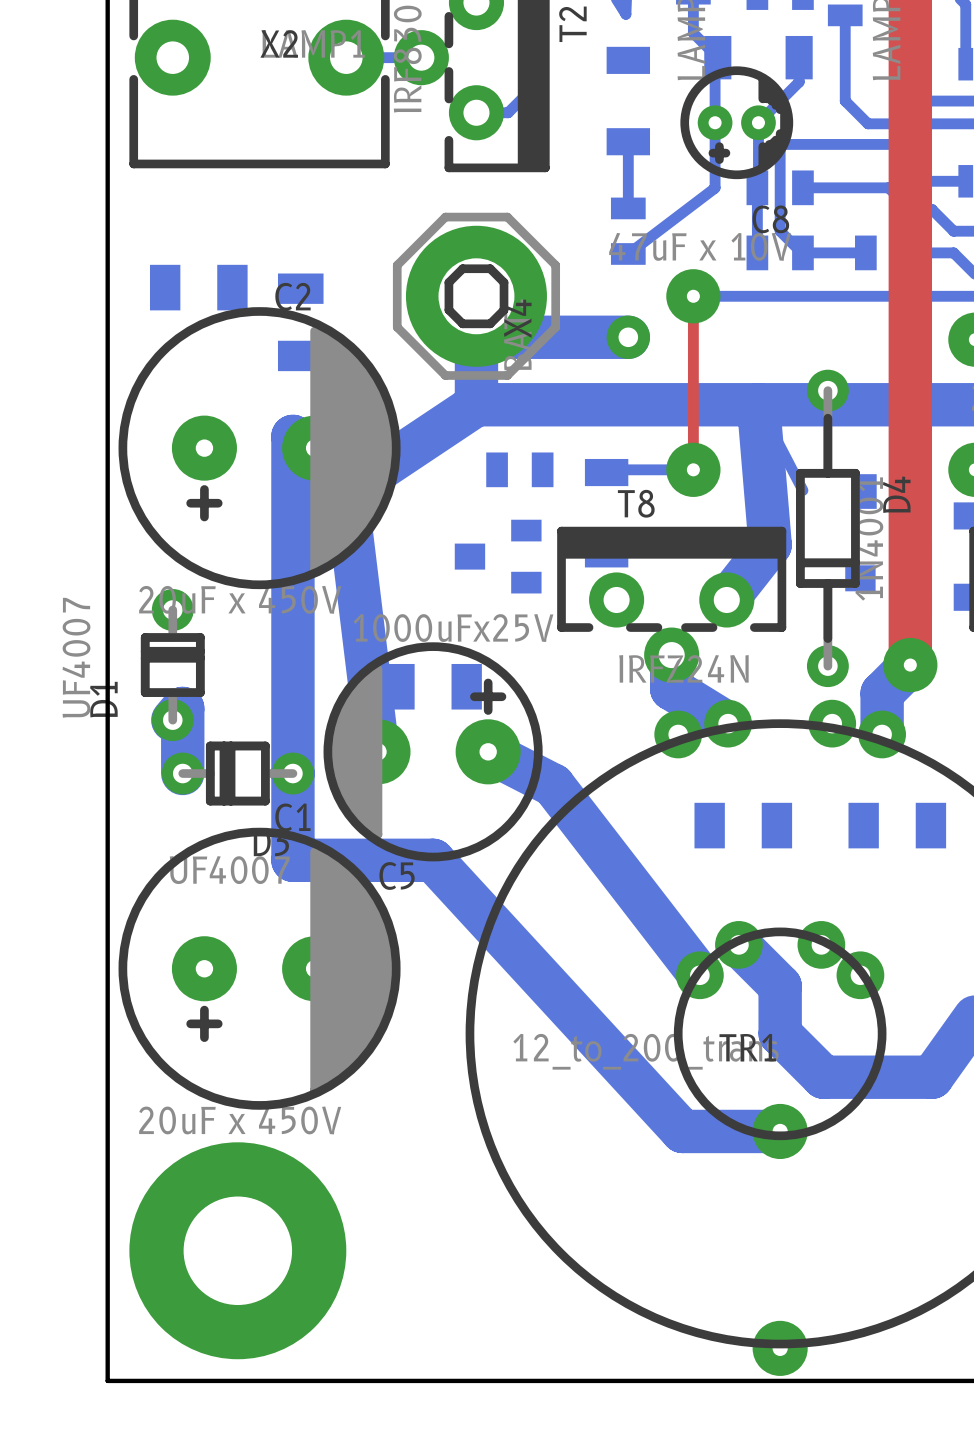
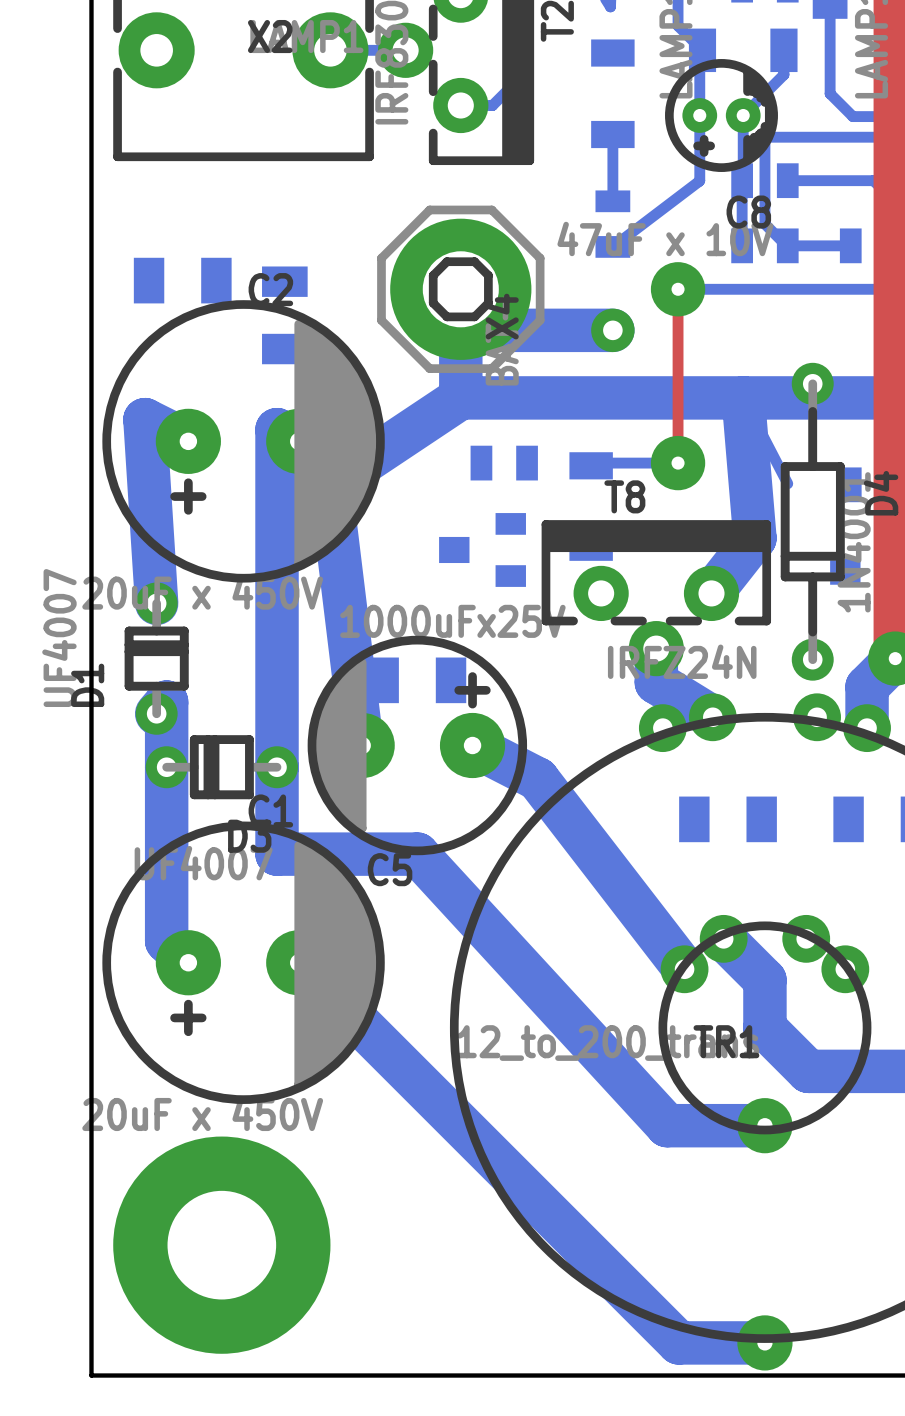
bottom track: none -> (188, 441) (144, 419) (156, 603)
bottom track: none -> (166, 767) (166, 941) (188, 962)
bottom track: none -> (298, 962) (678, 1342) (764, 1342)

